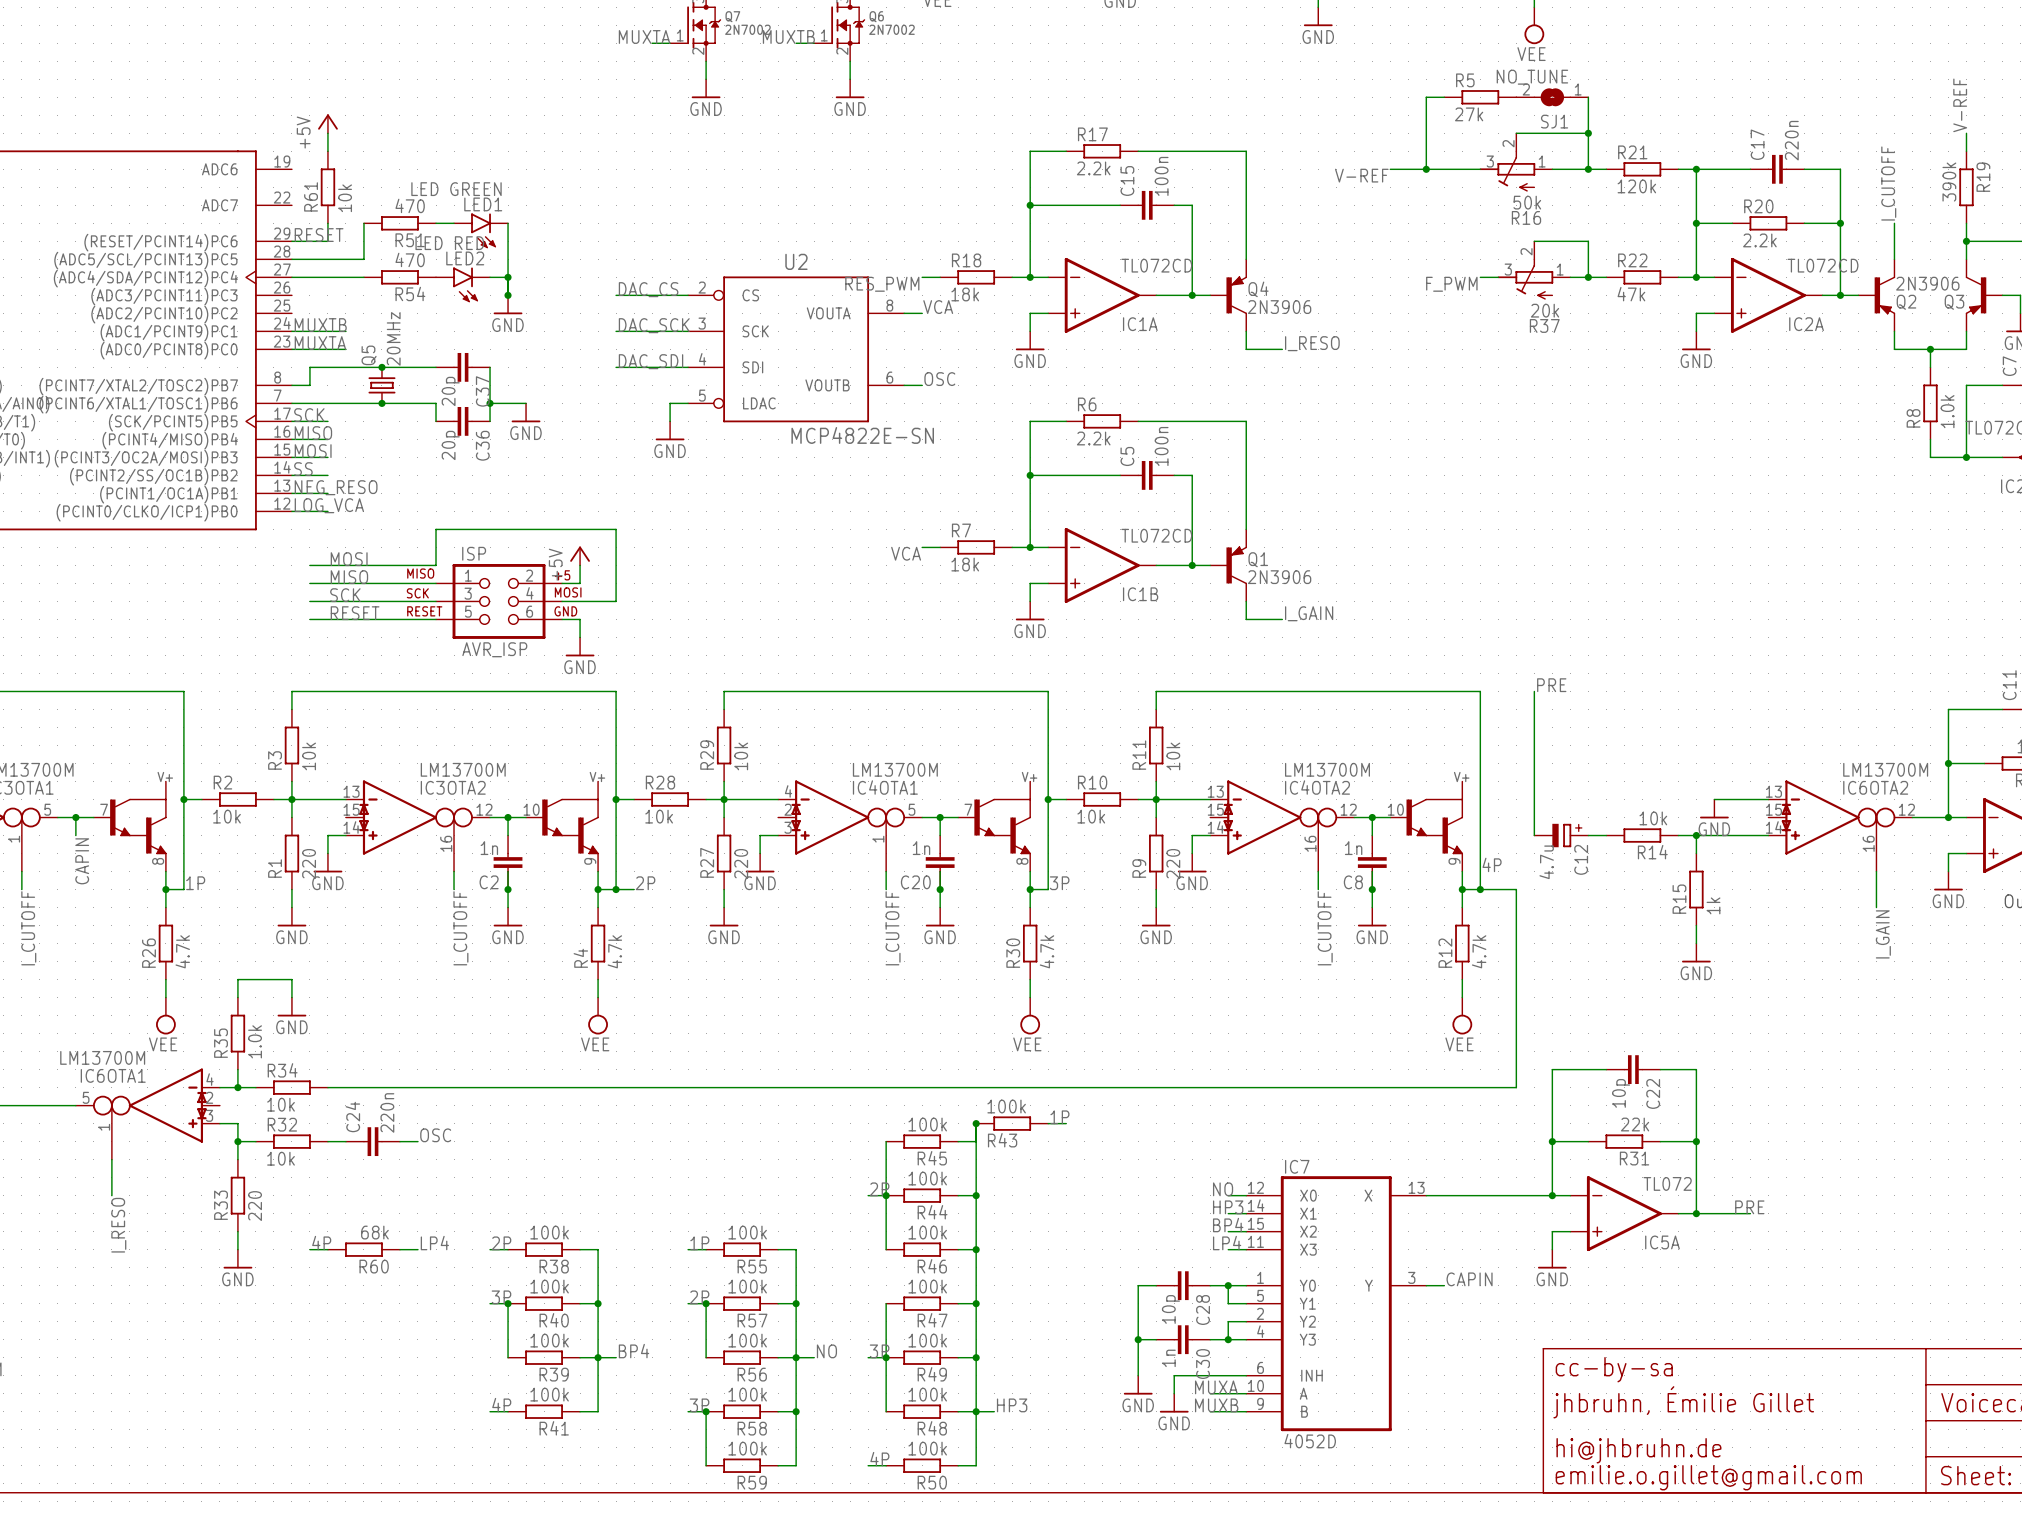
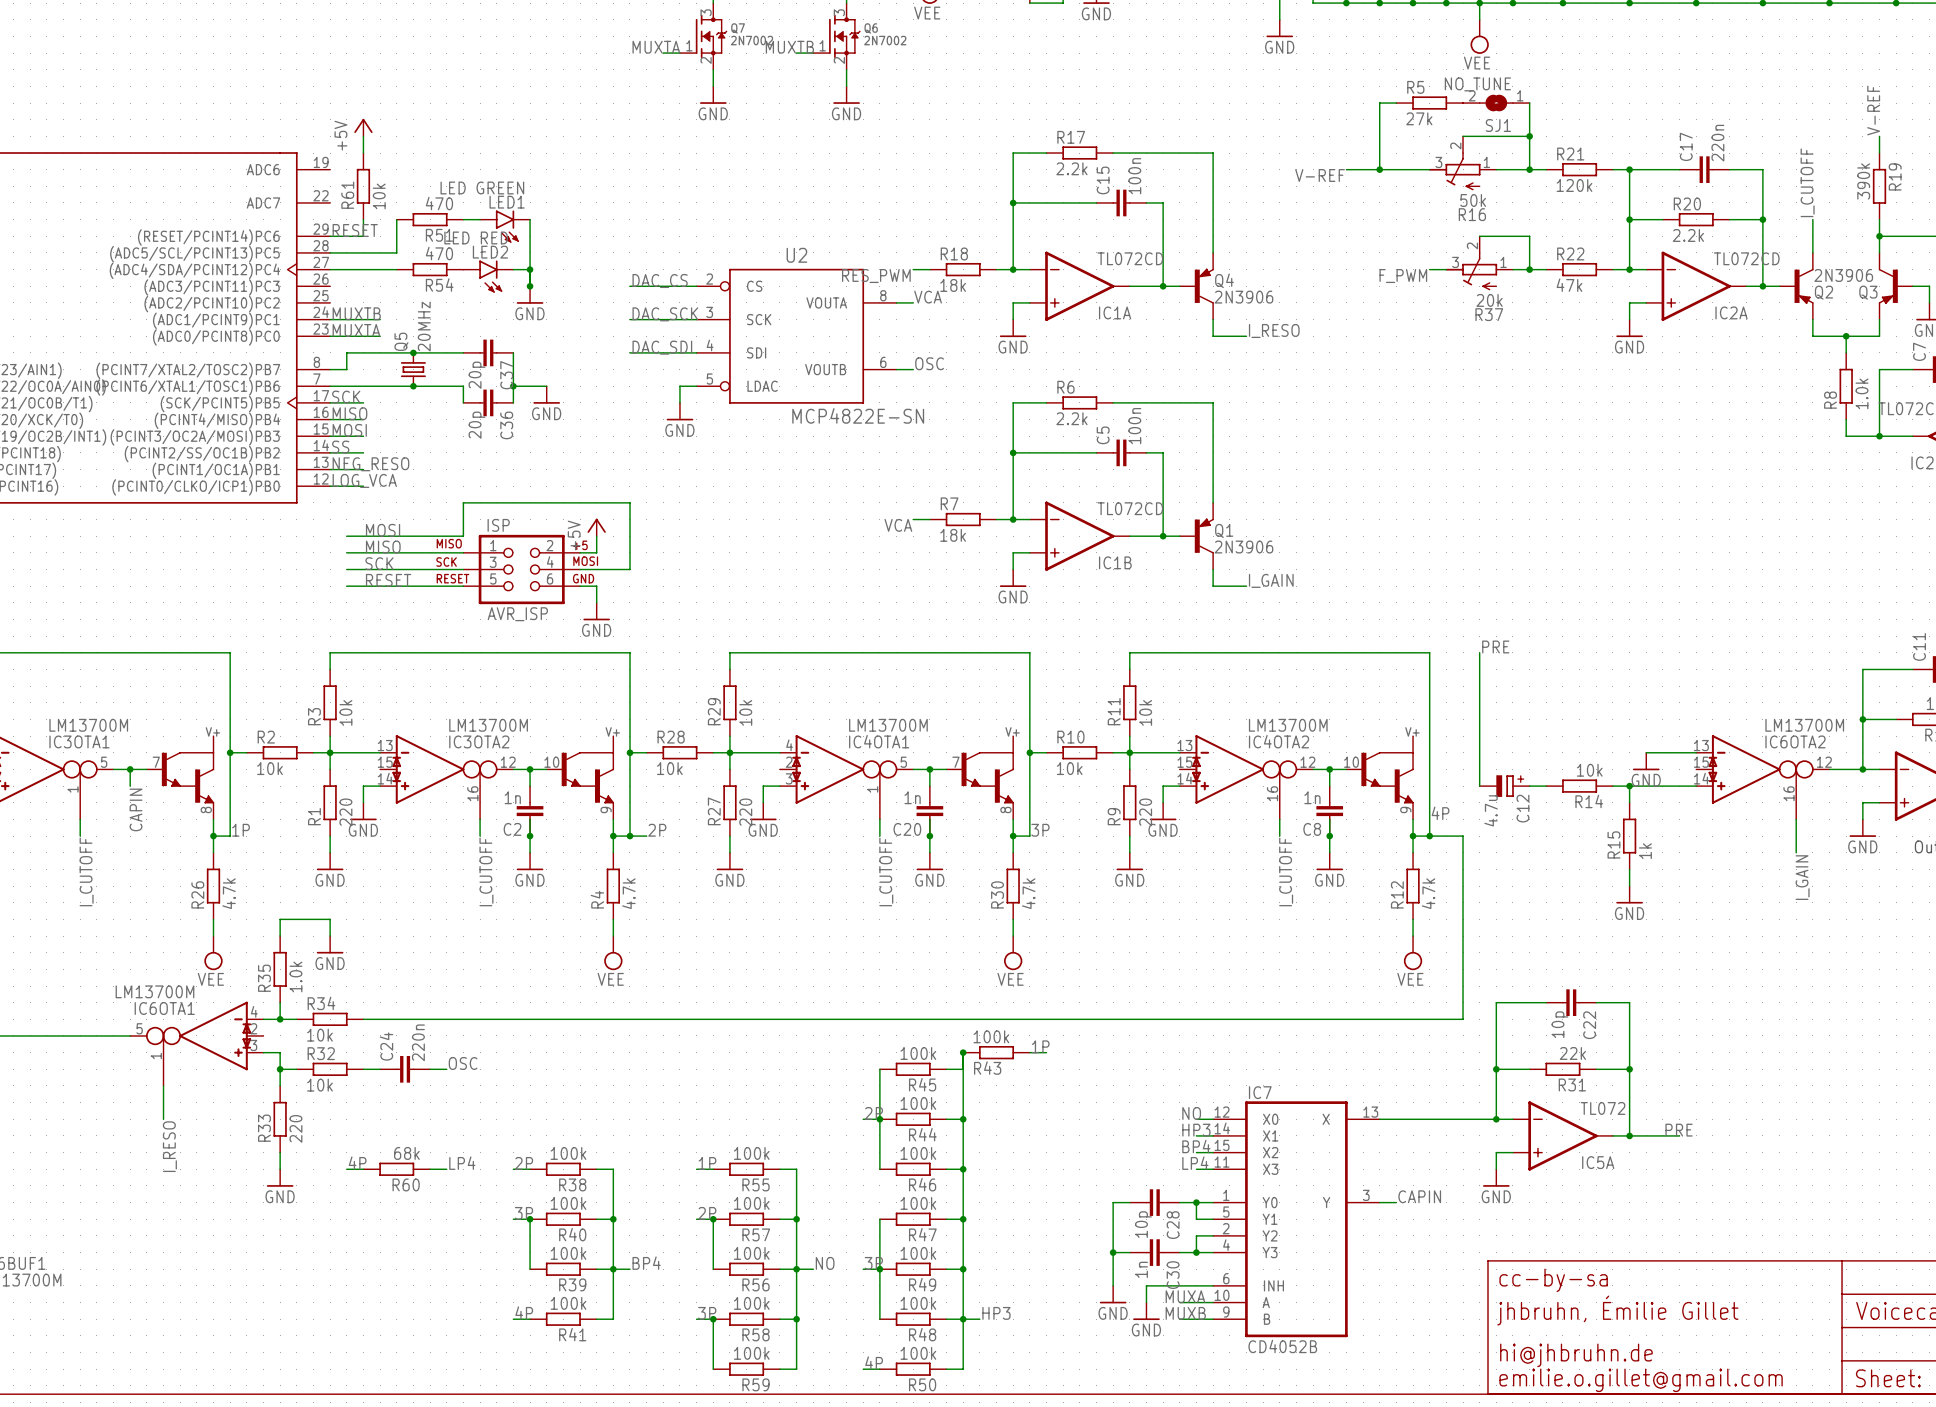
IC7 value: 4052D (1310, 1441) -> CD4052B (1282, 1346)

